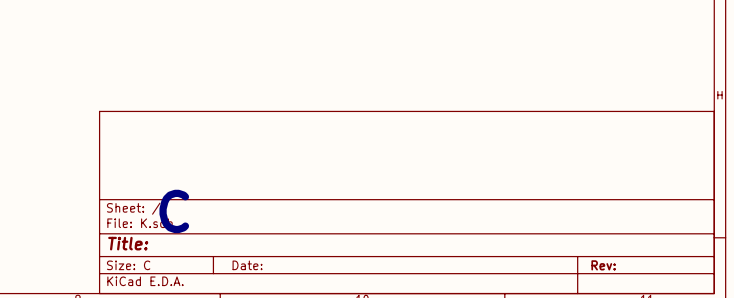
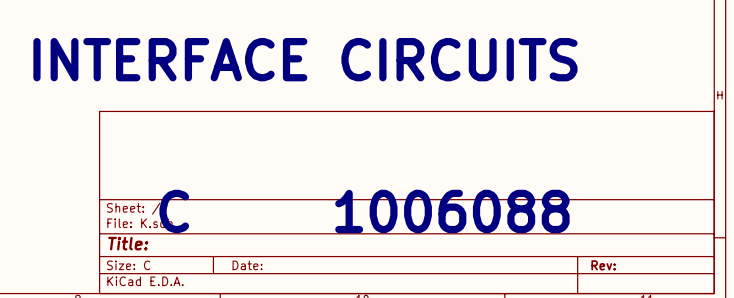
text: none -> INTERFACE CIRCUITS (305, 59)
text: none -> 1006088 (452, 211)

